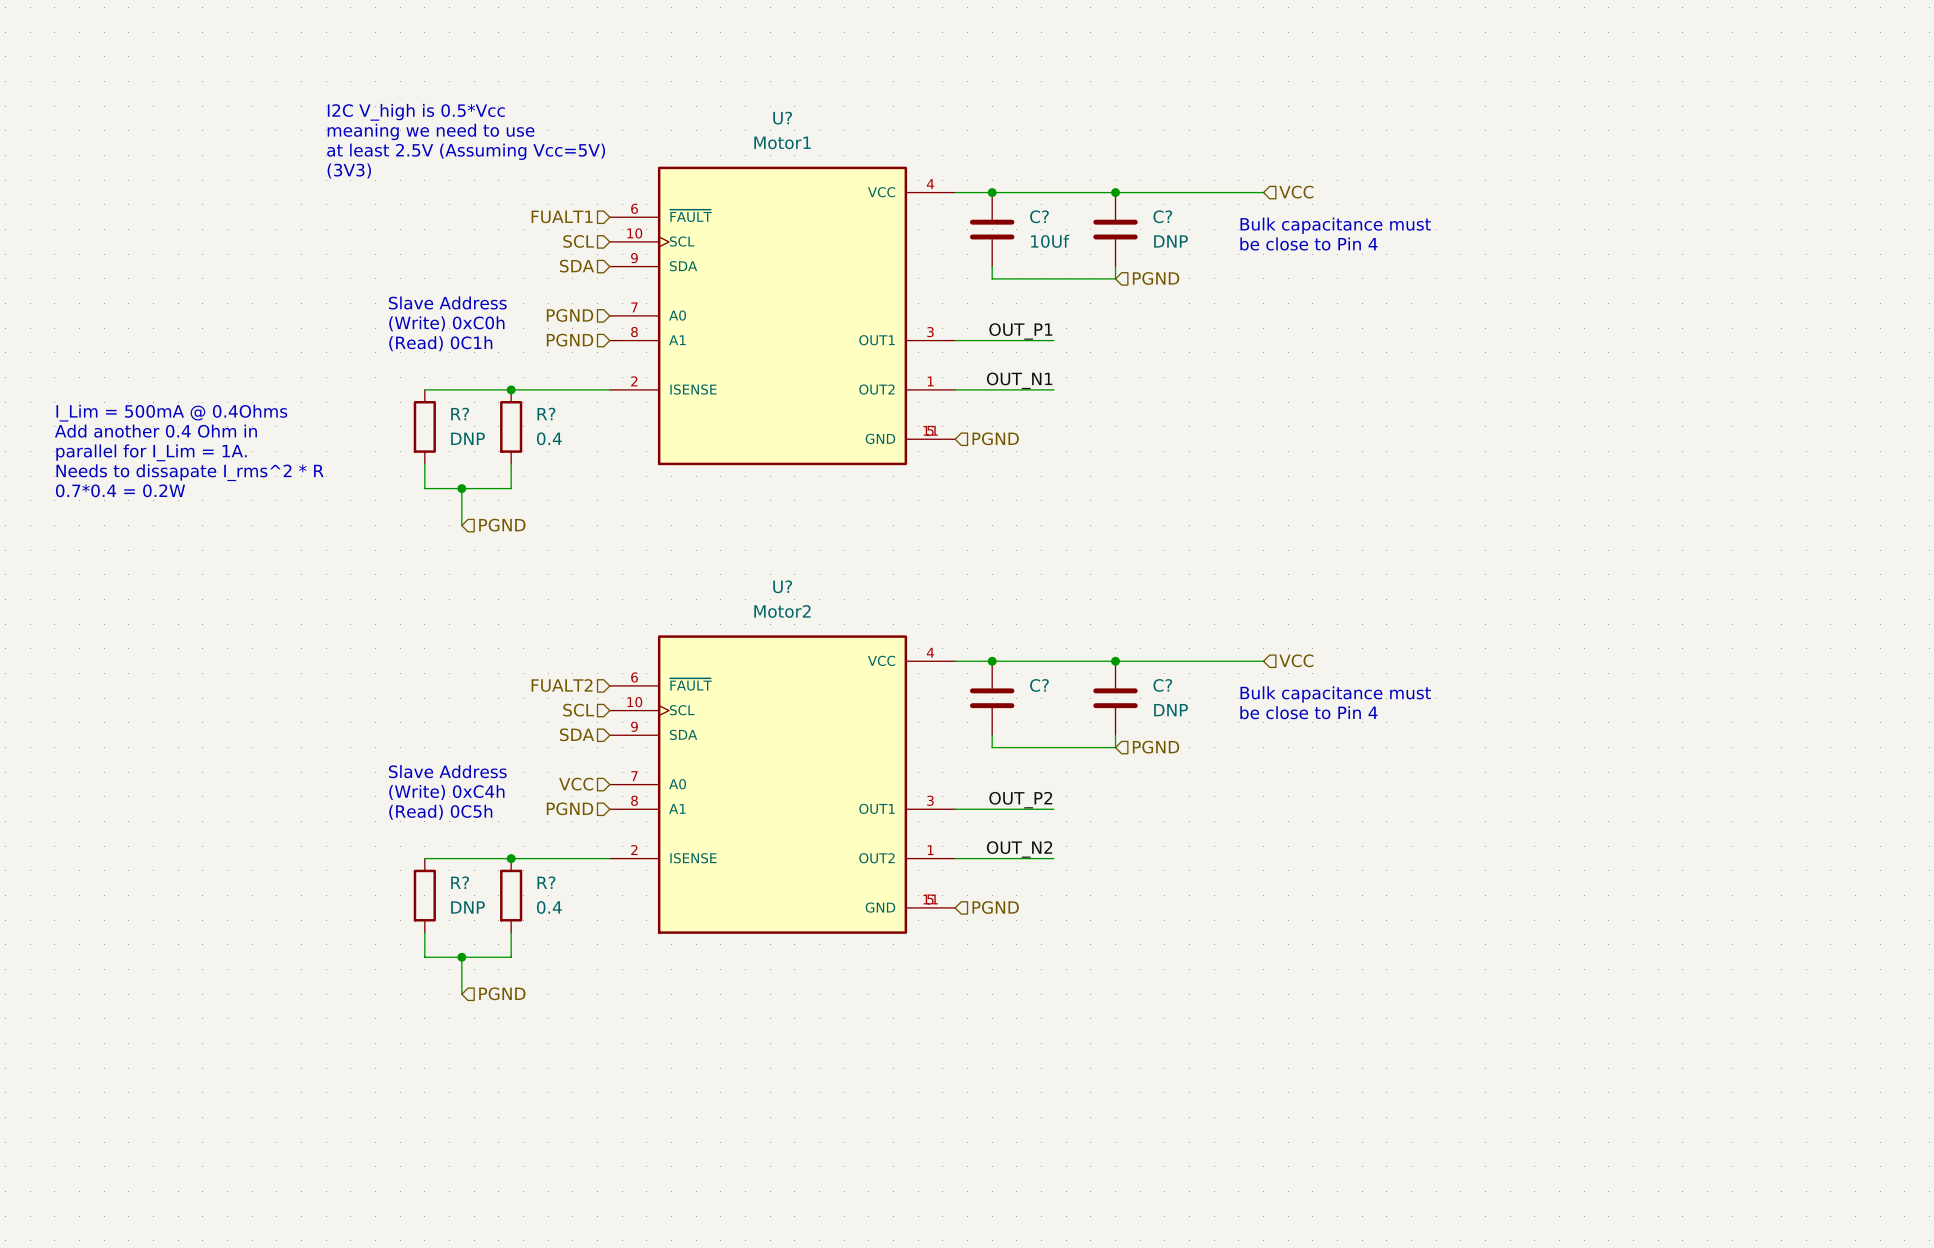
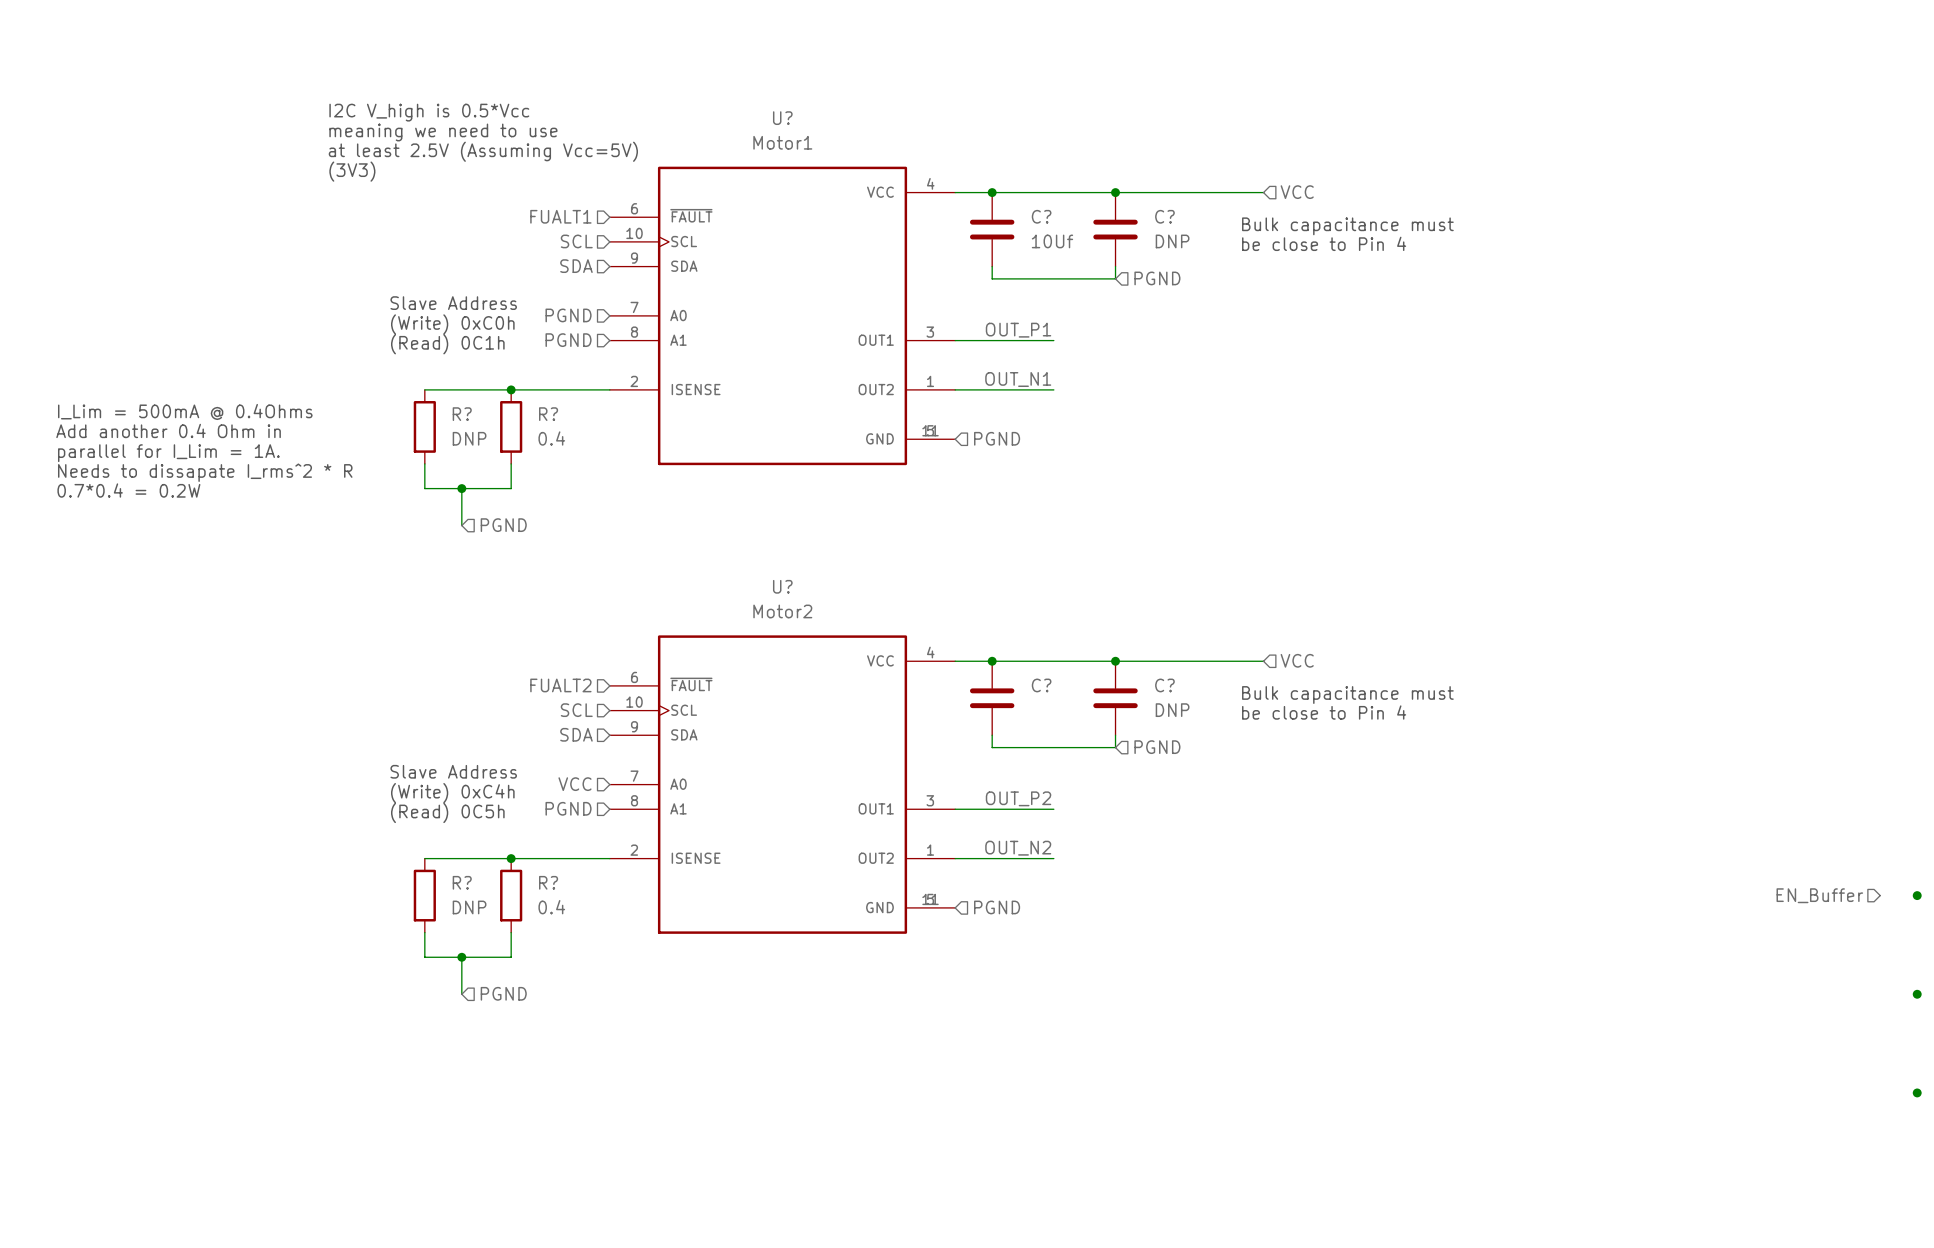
junction: none -> (1917, 895)
hierarchical label: none -> EN_Buffer (1819, 895)
junction: none -> (1917, 994)
junction: none -> (1917, 1092)

